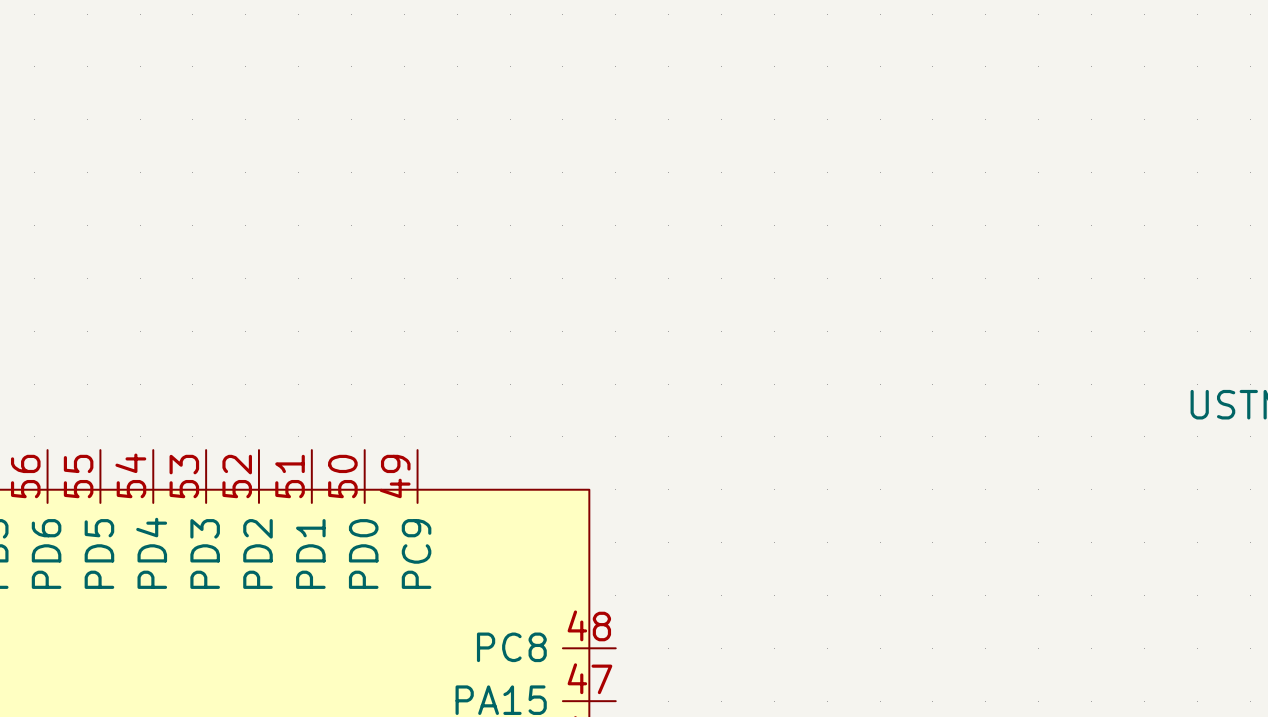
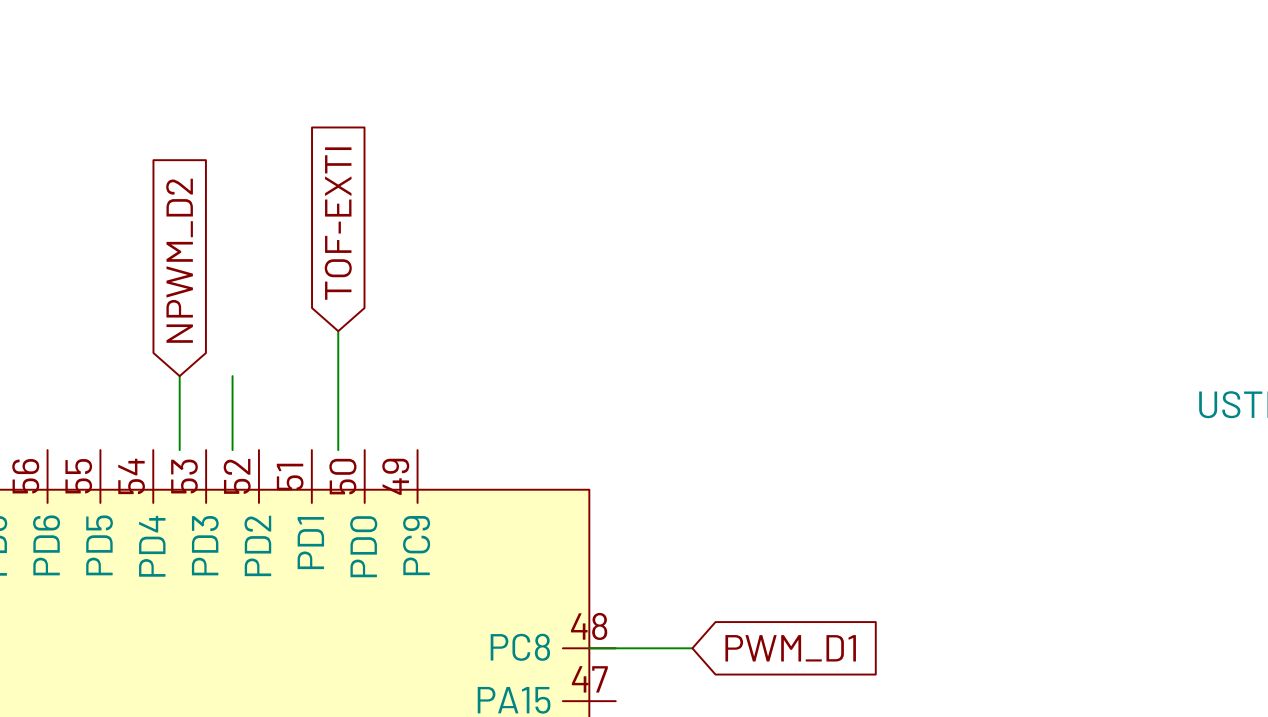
global label: none -> TOF-EXTI (338, 223)
global label: none -> NPWM_D2 (179, 260)
wire: none -> (338, 331) (338, 450)
wire: none -> (179, 376) (179, 450)
wire: none -> (232, 376) (232, 450)
wire: none -> (589, 648) (692, 648)
global label: none -> PWM_D1 (790, 648)

